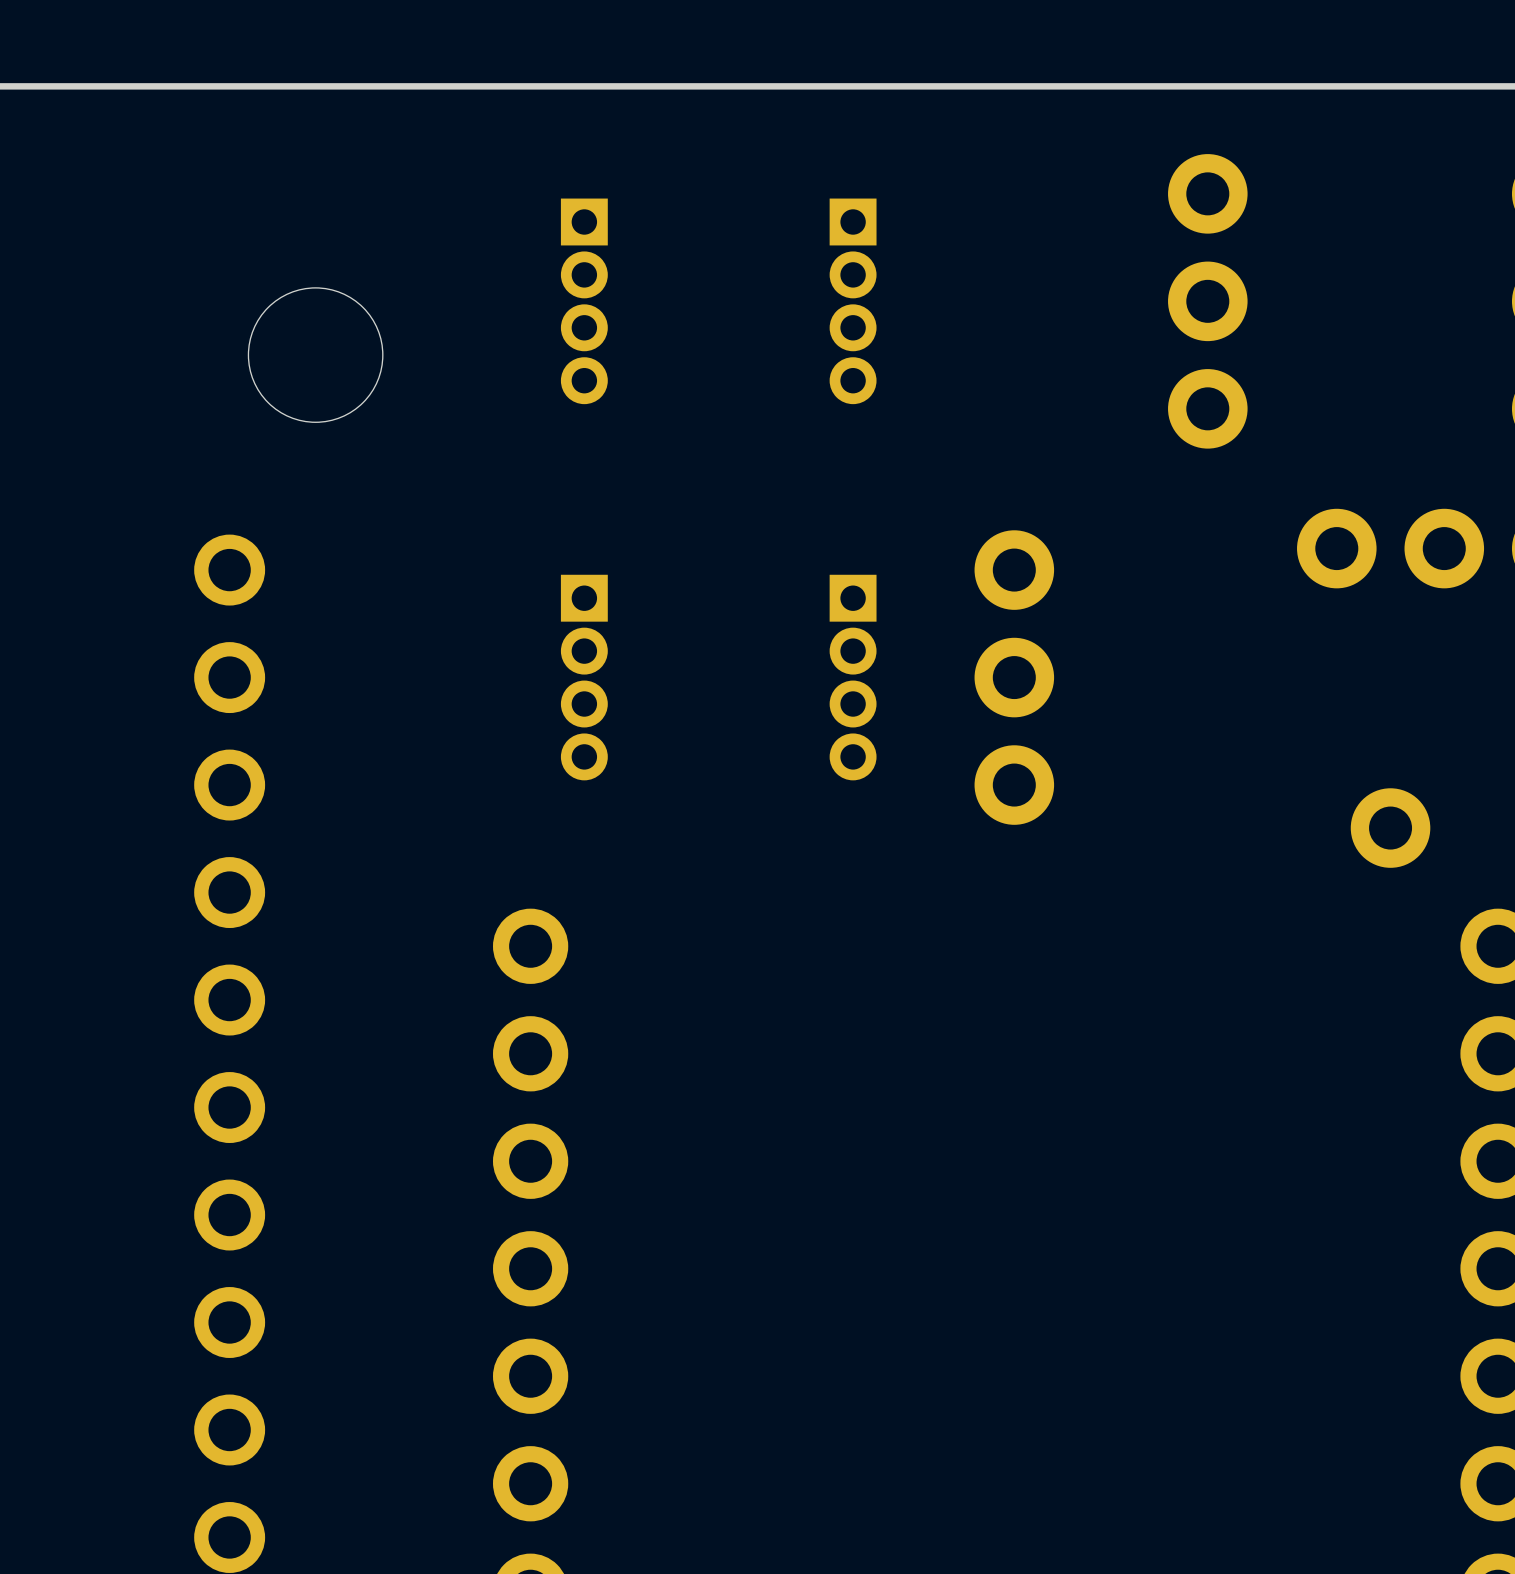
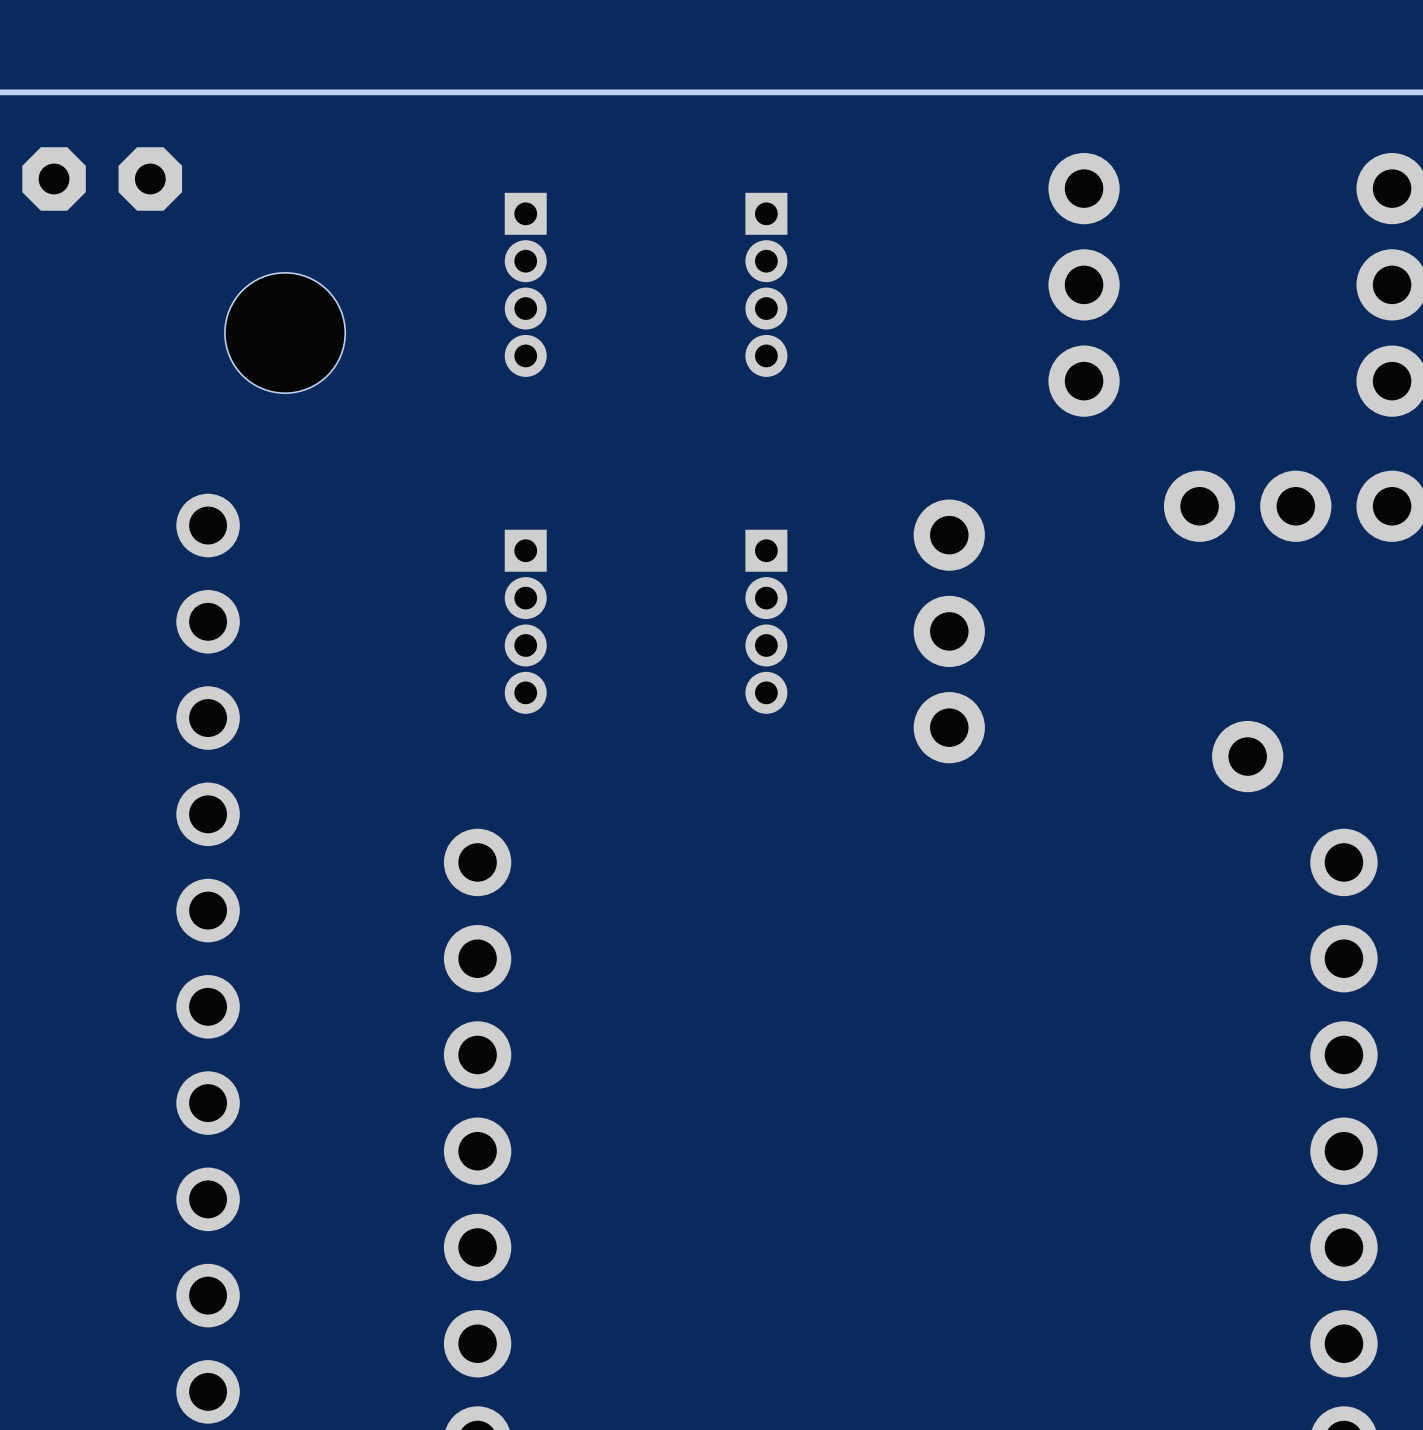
part: none -> (102, 178)
part position: (1014, 677) -> (949, 631)

